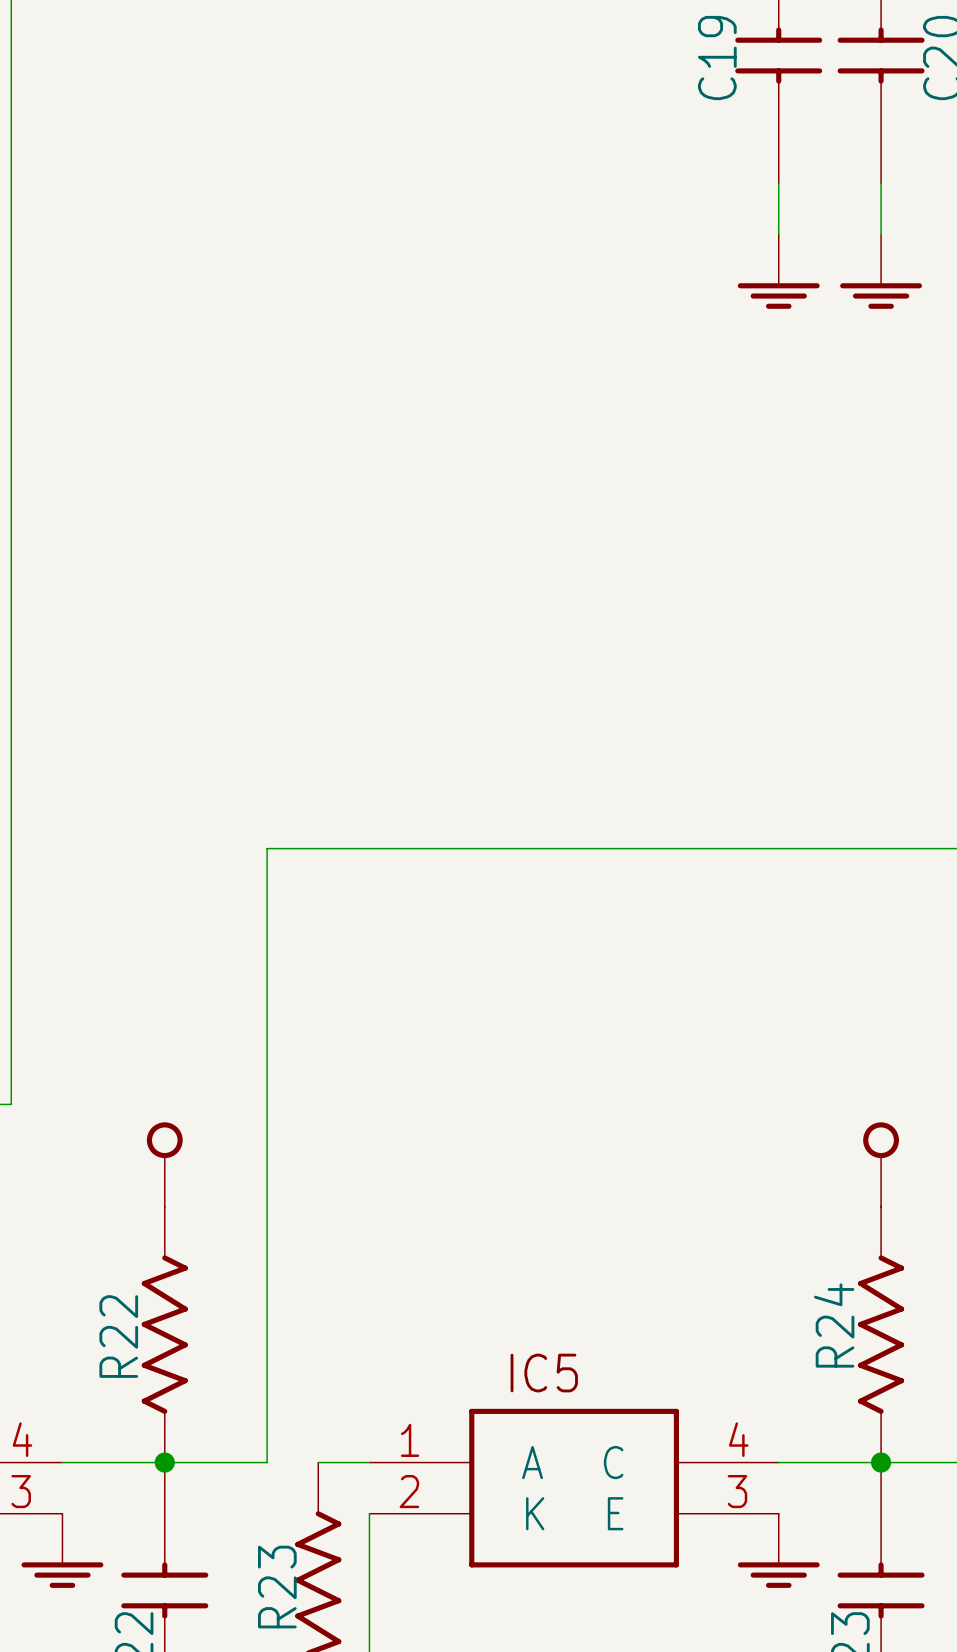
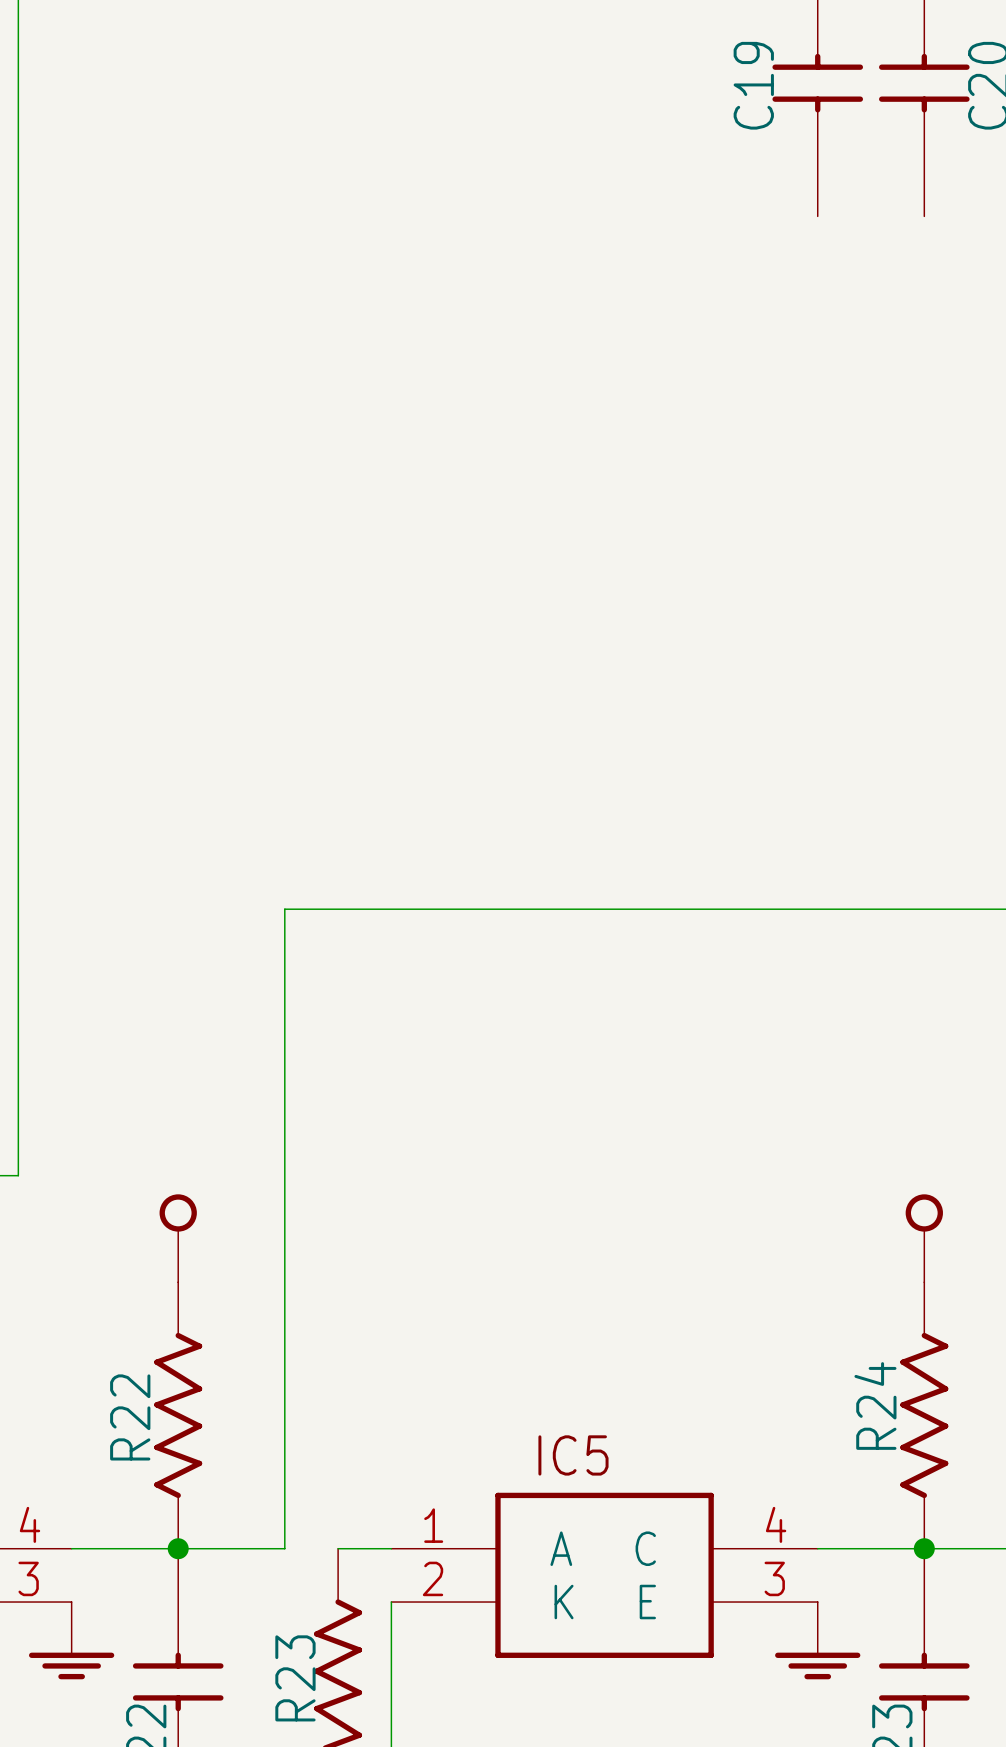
wire: (778, 183) (778, 234) -> none
wire: (881, 183) (881, 234) -> none
power symbol: (778, 271) -> none
power symbol: (881, 271) -> none

